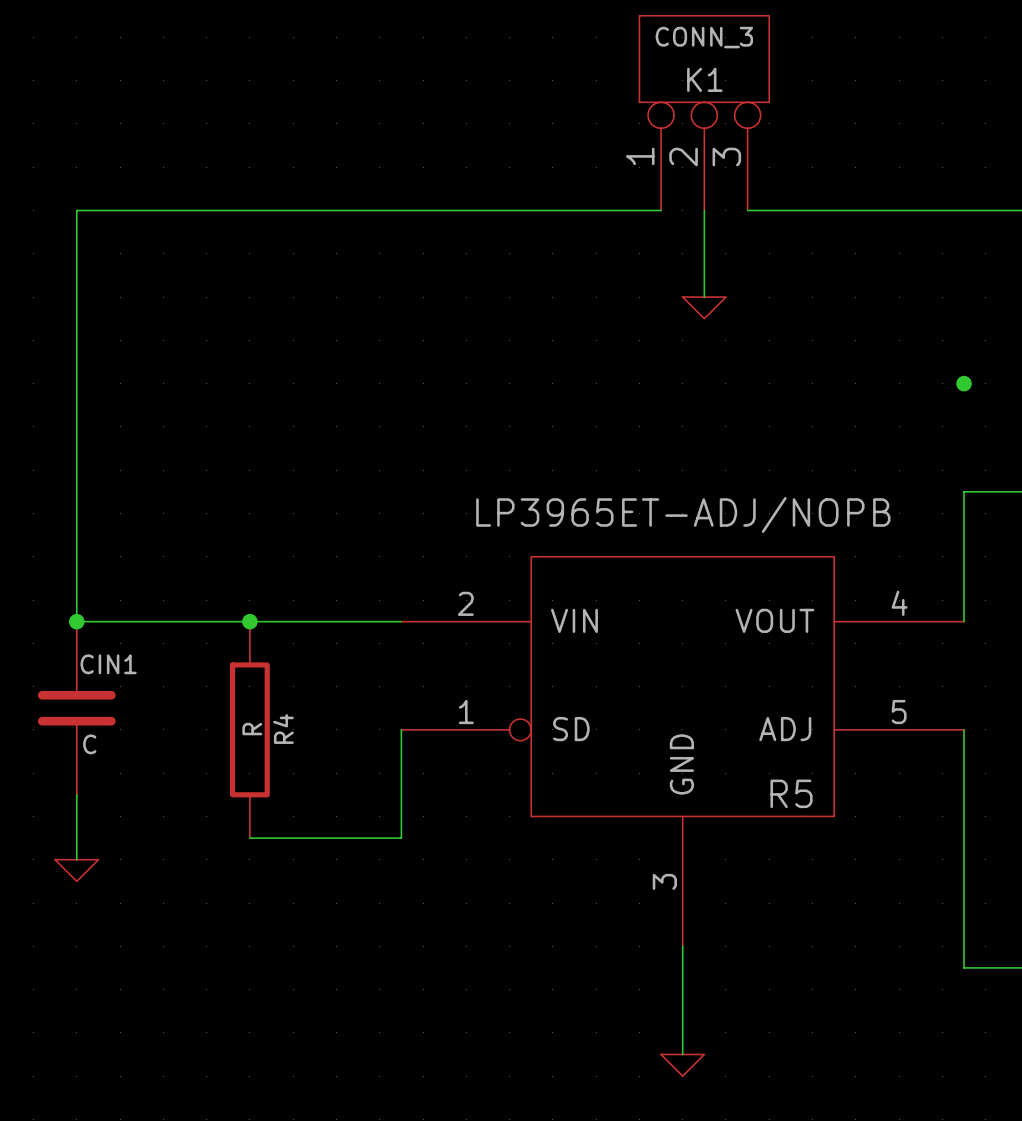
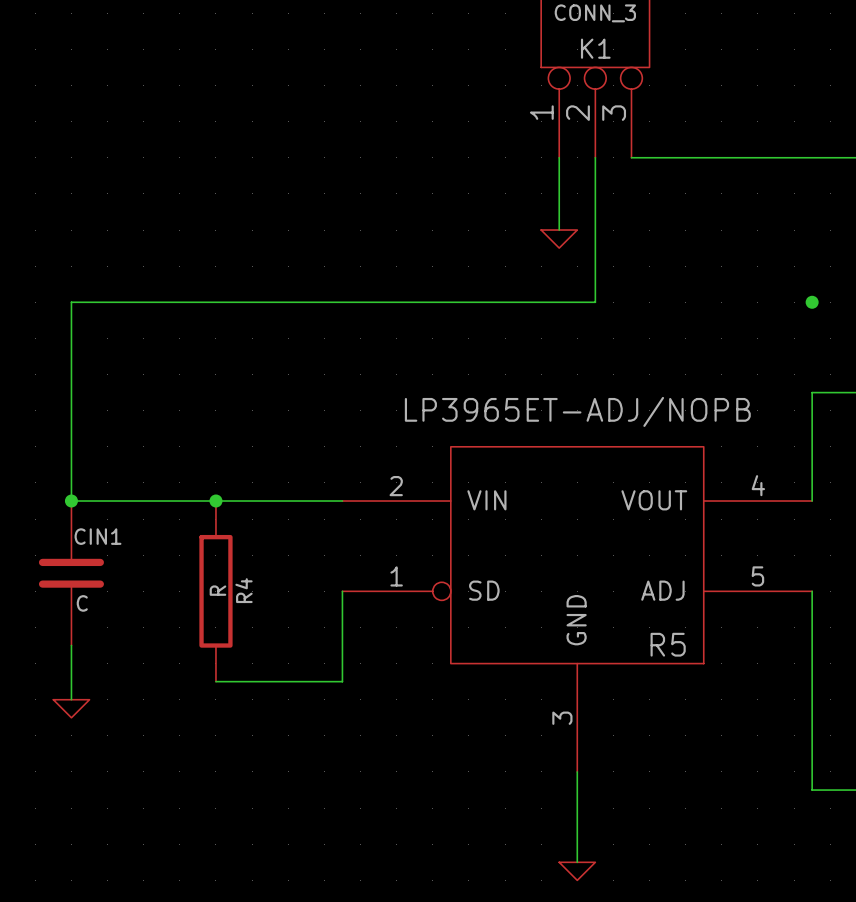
wire: (661, 210) (76, 210) (76, 383) -> (595, 230) (595, 302) (71, 302)
wire: none -> (559, 157) (559, 230)
power symbol position: (704, 307) -> (559, 239)

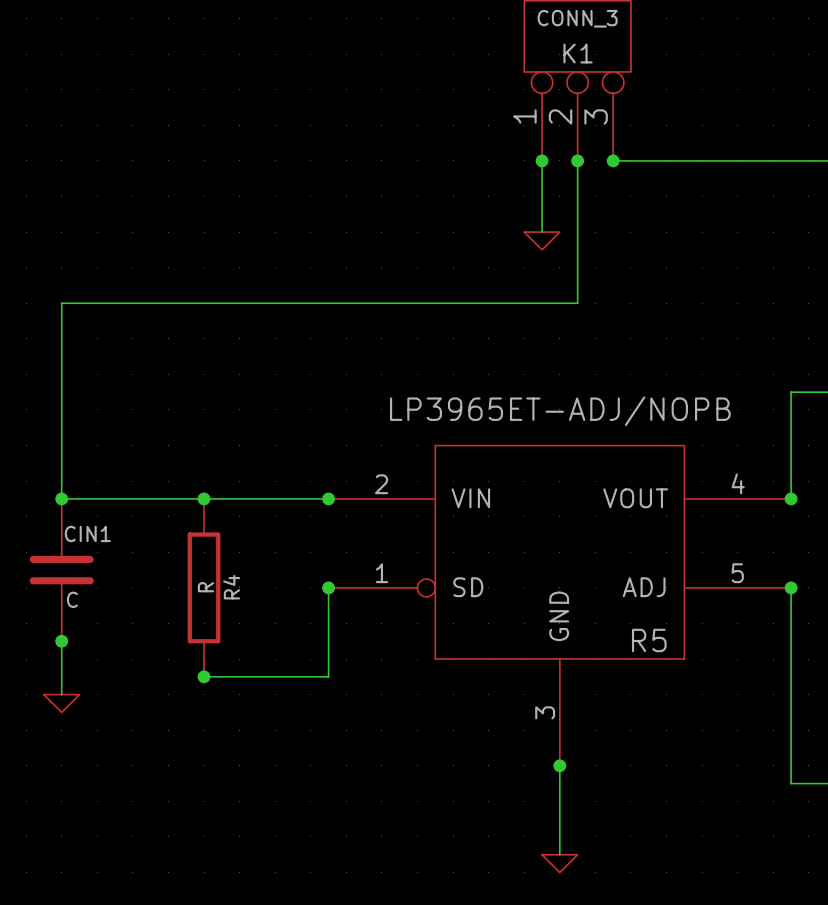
junction: none -> (542, 160)
junction: none -> (577, 160)
junction: none -> (613, 160)
junction: (812, 302) -> none
junction: none -> (328, 498)
junction: none -> (791, 498)
junction: none -> (328, 587)
junction: none -> (791, 587)
junction: none -> (61, 641)
junction: none -> (204, 676)
junction: none -> (559, 765)

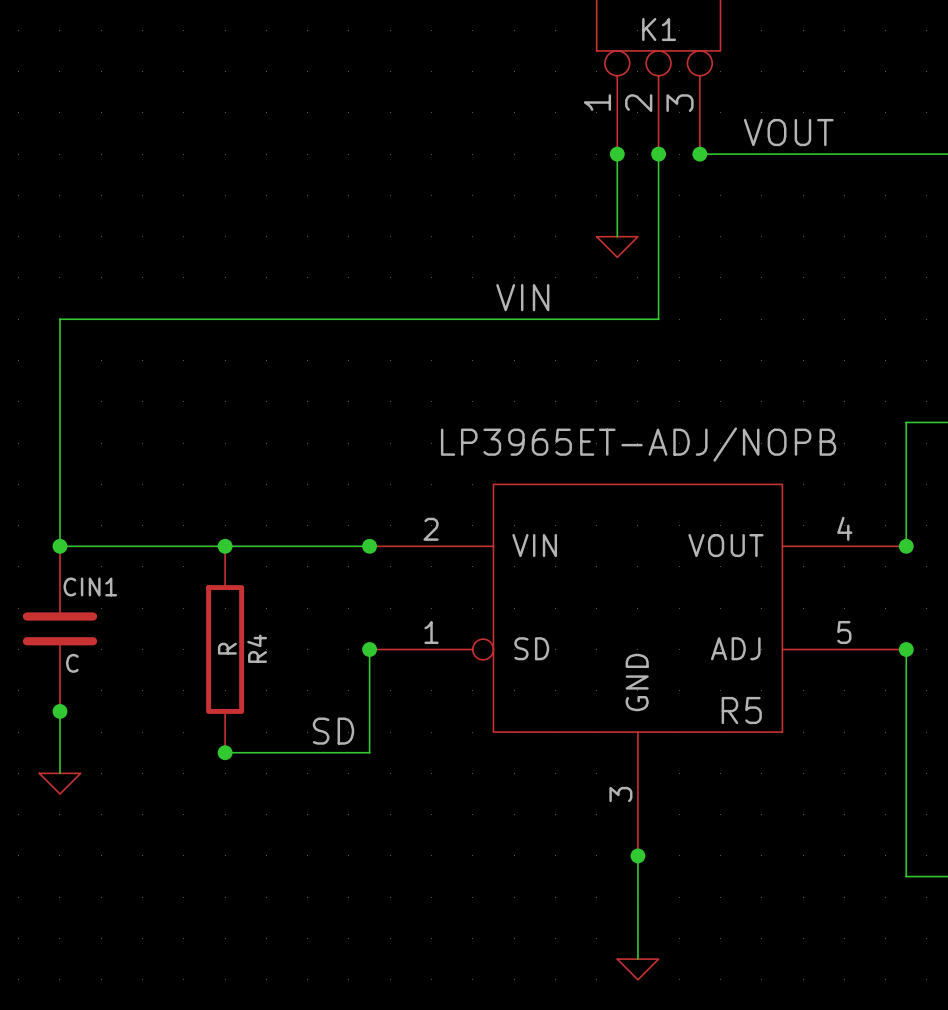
label: none -> VOUT (788, 132)
label: none -> VIN (522, 297)
label: none -> SD (333, 731)

